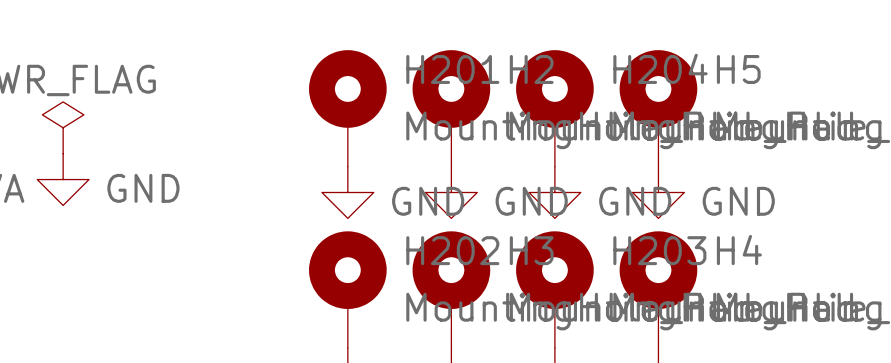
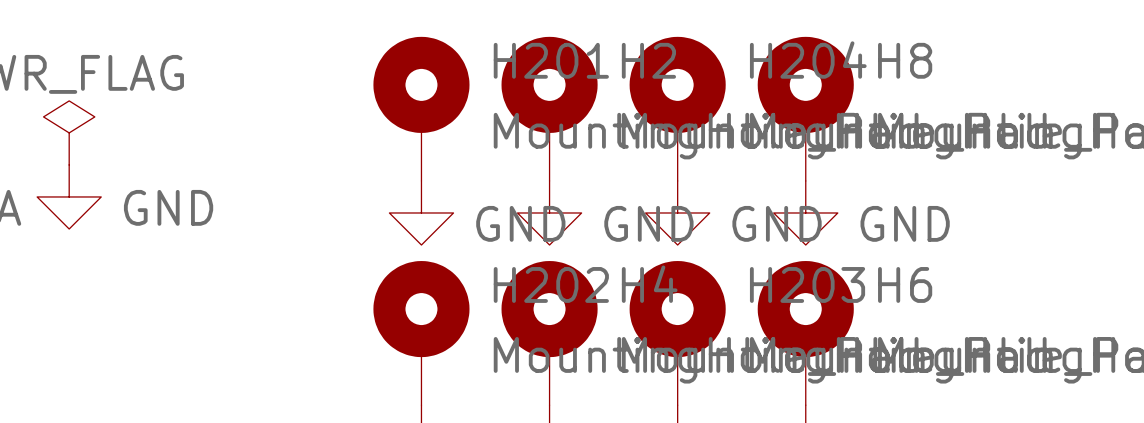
H5 name: H5 (738, 69) -> H8 (905, 60)
H3 name: H3 (531, 250) -> H4 (649, 284)
H4 name: H4 (739, 250) -> H6 (905, 284)

